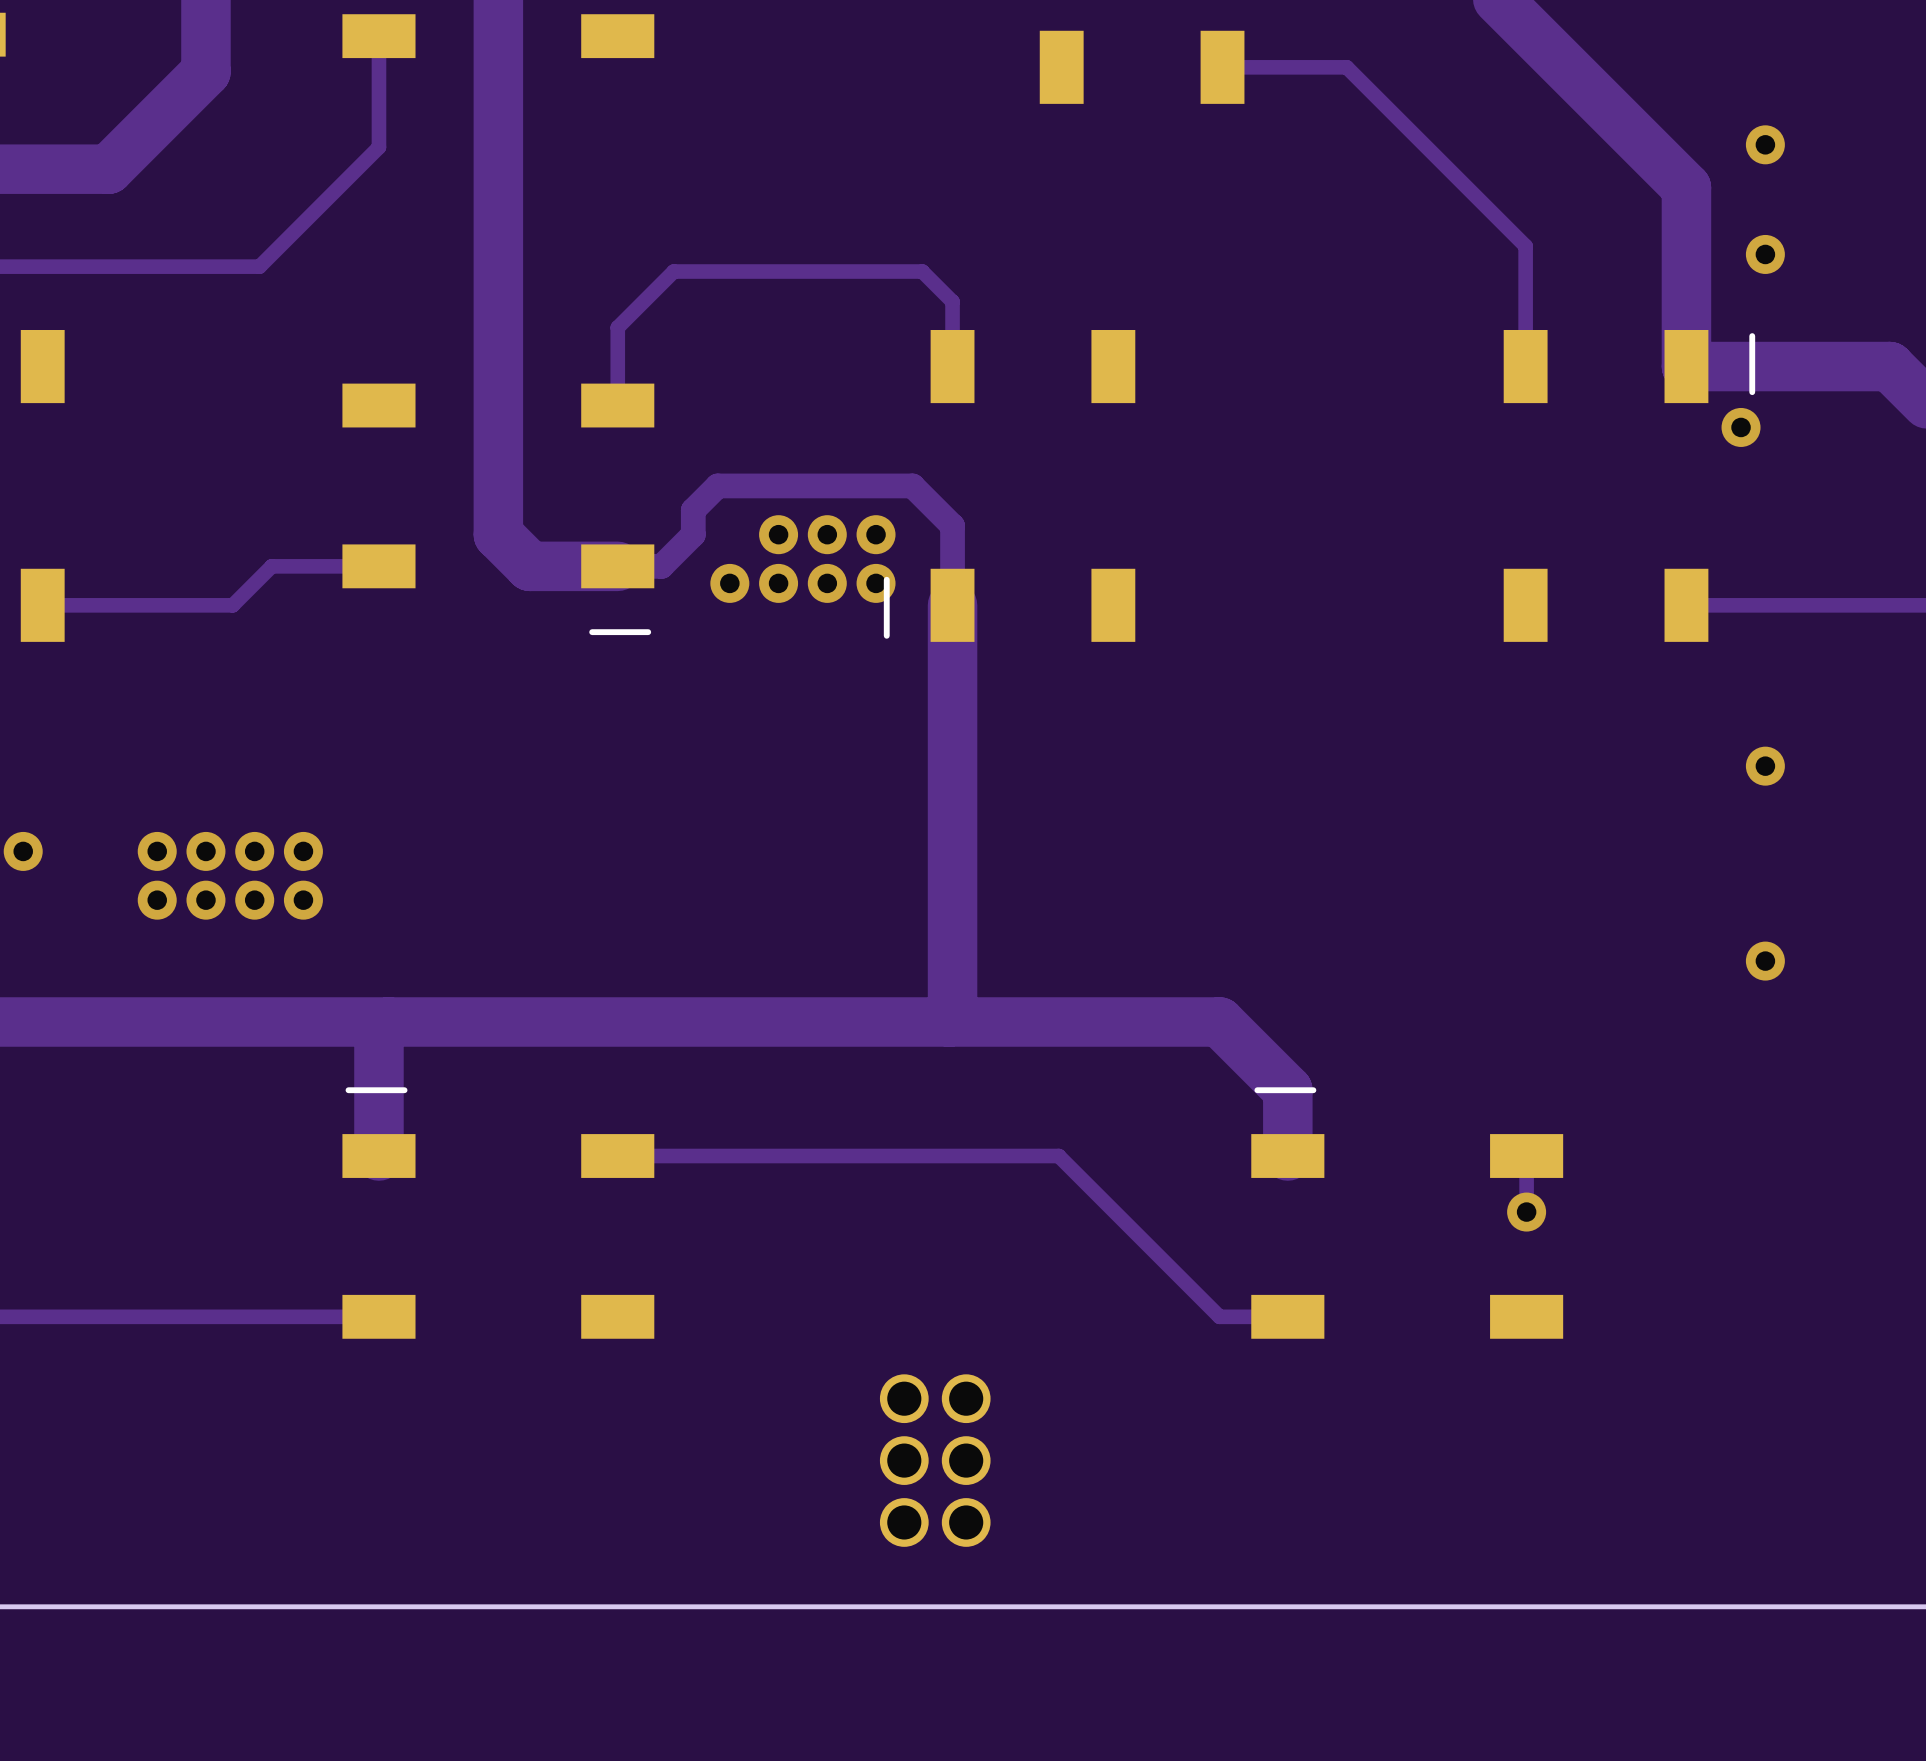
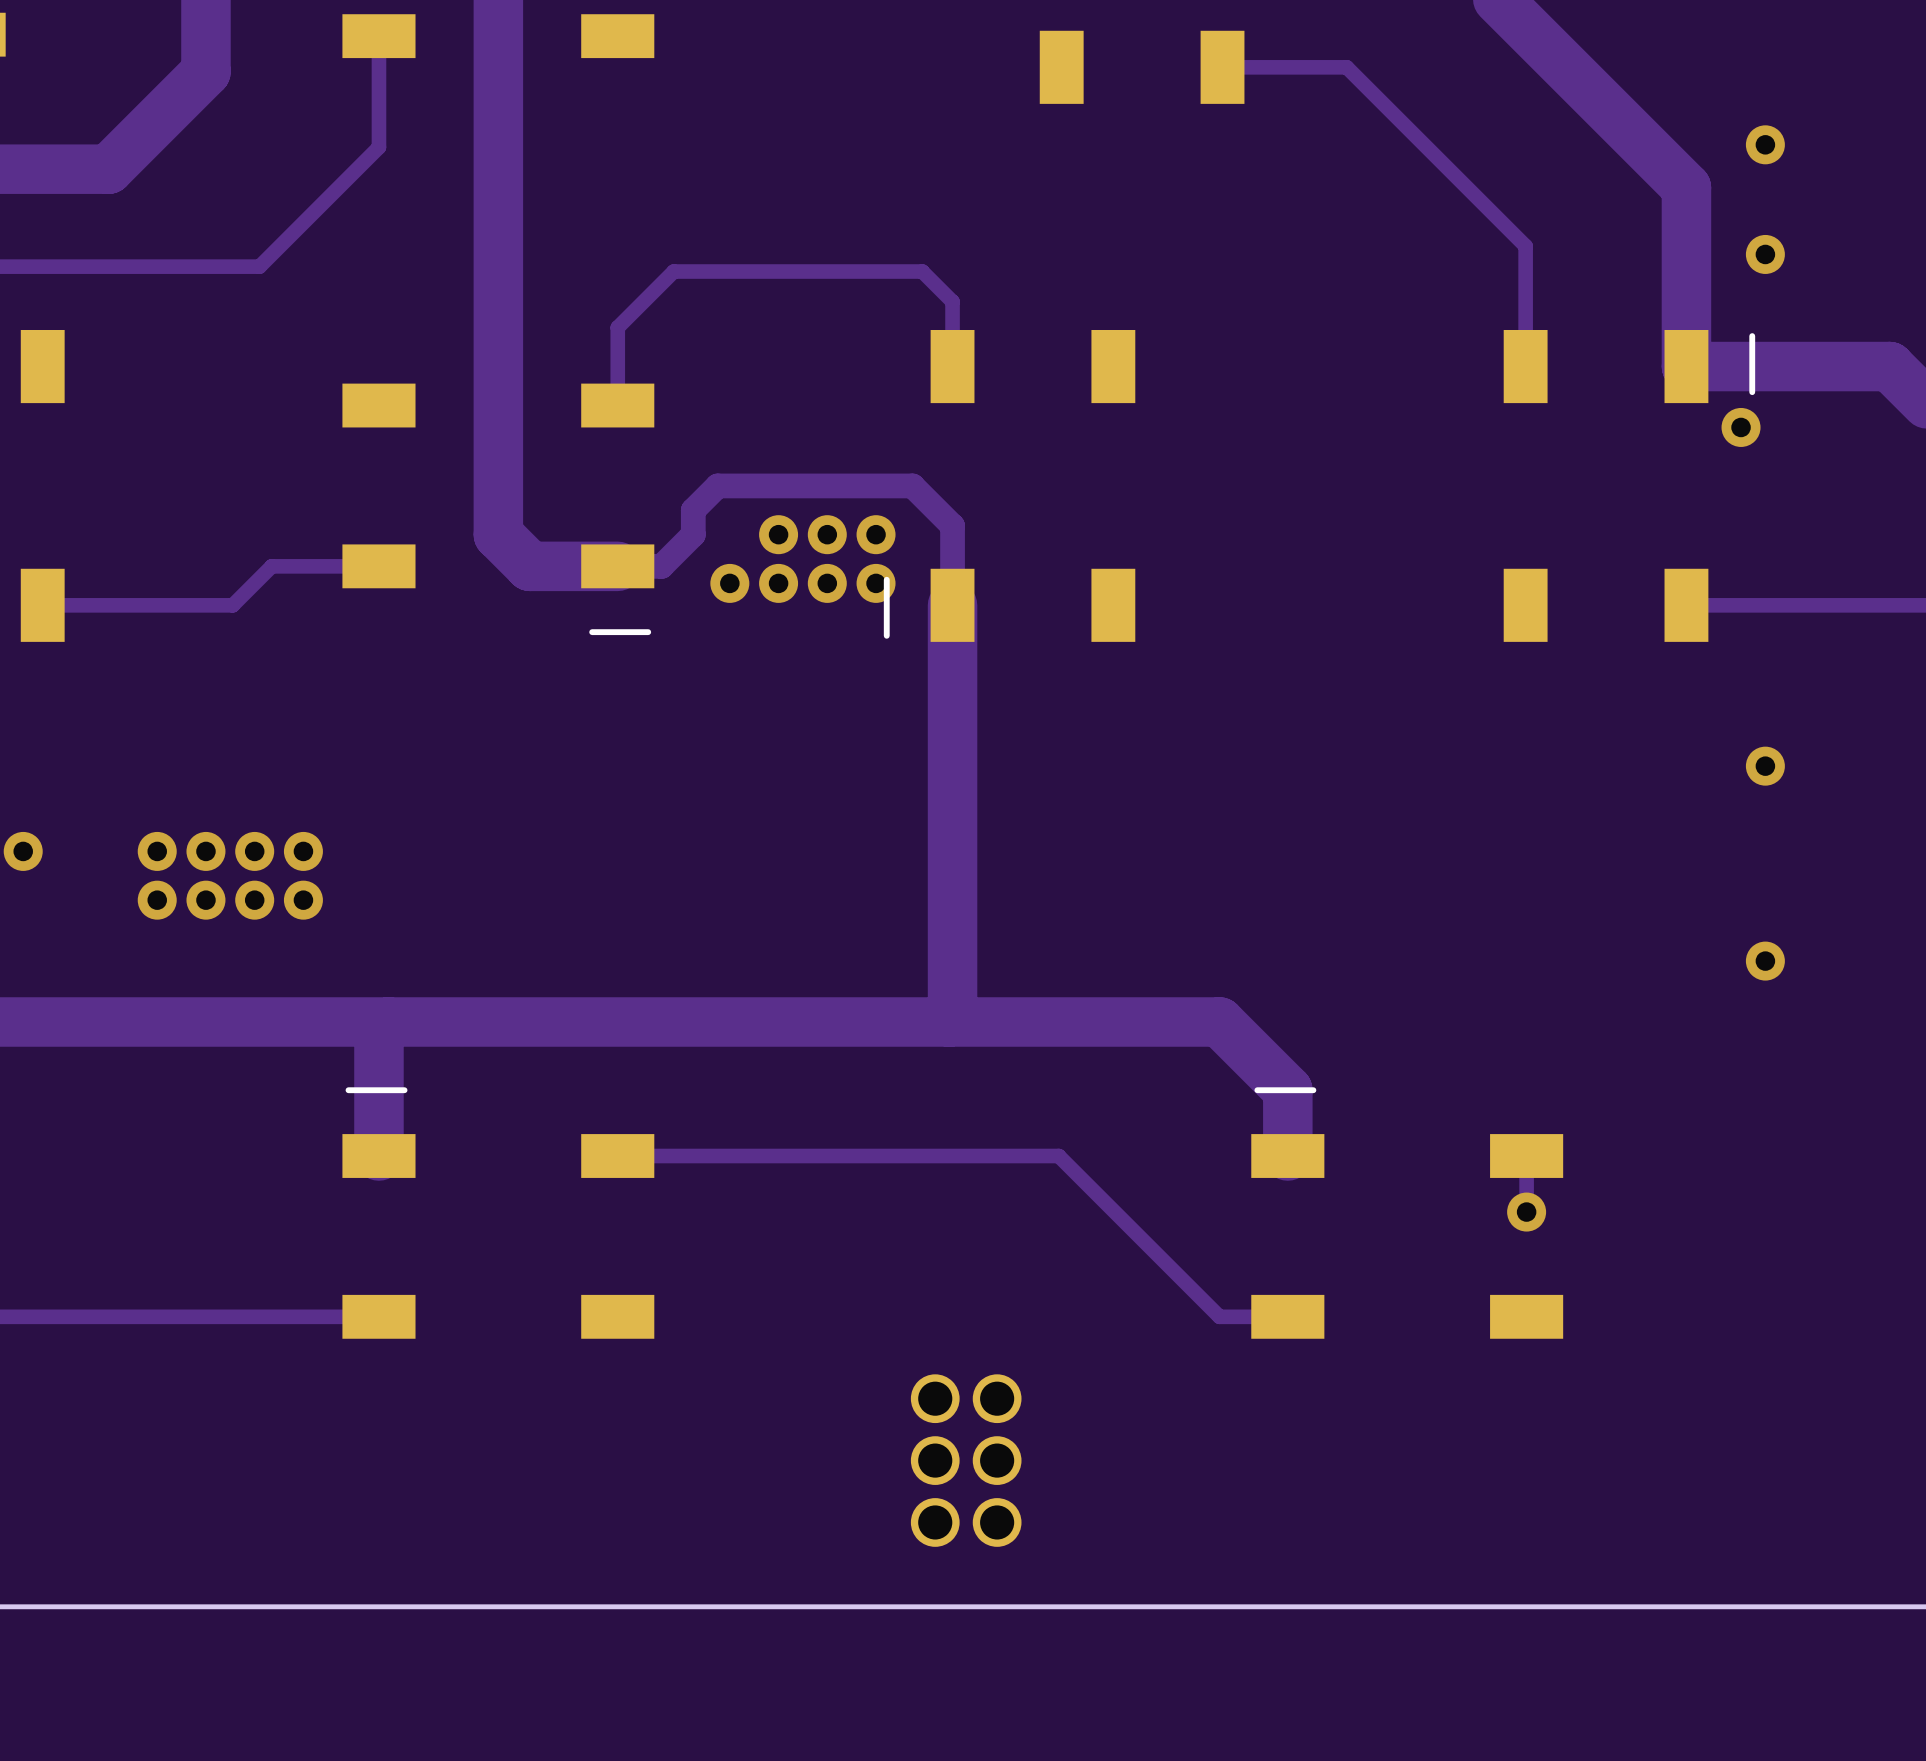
part position: (935, 1460) -> (966, 1460)

